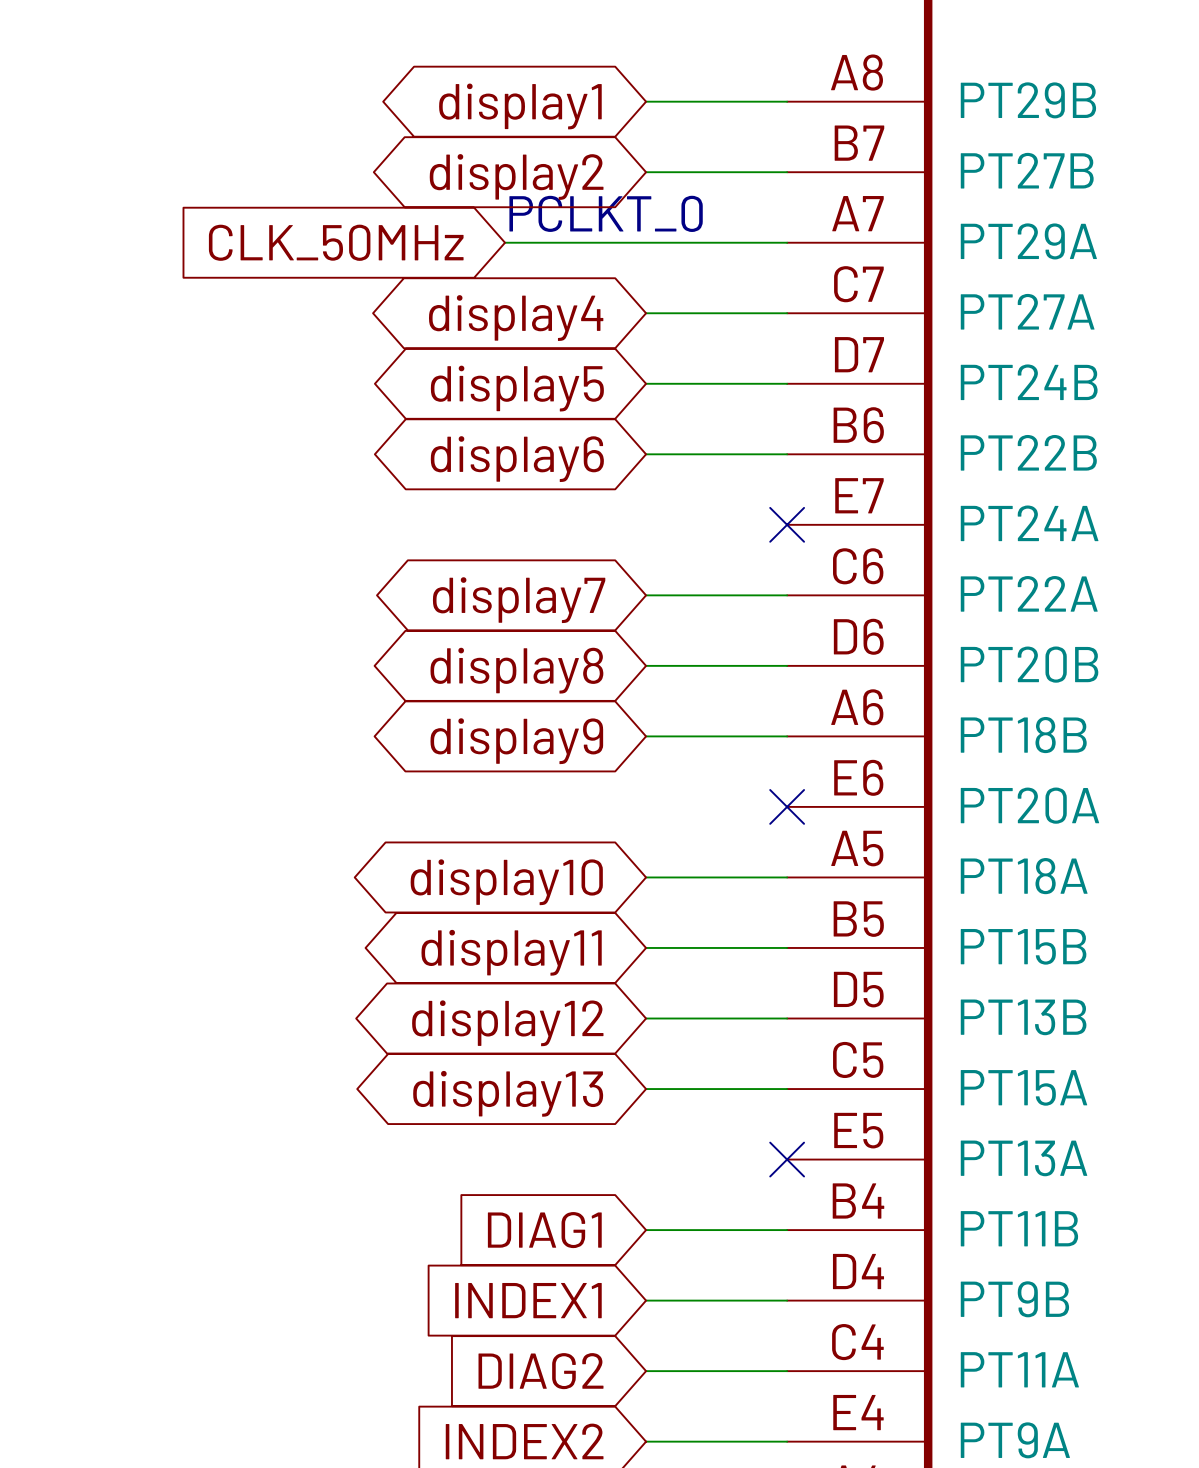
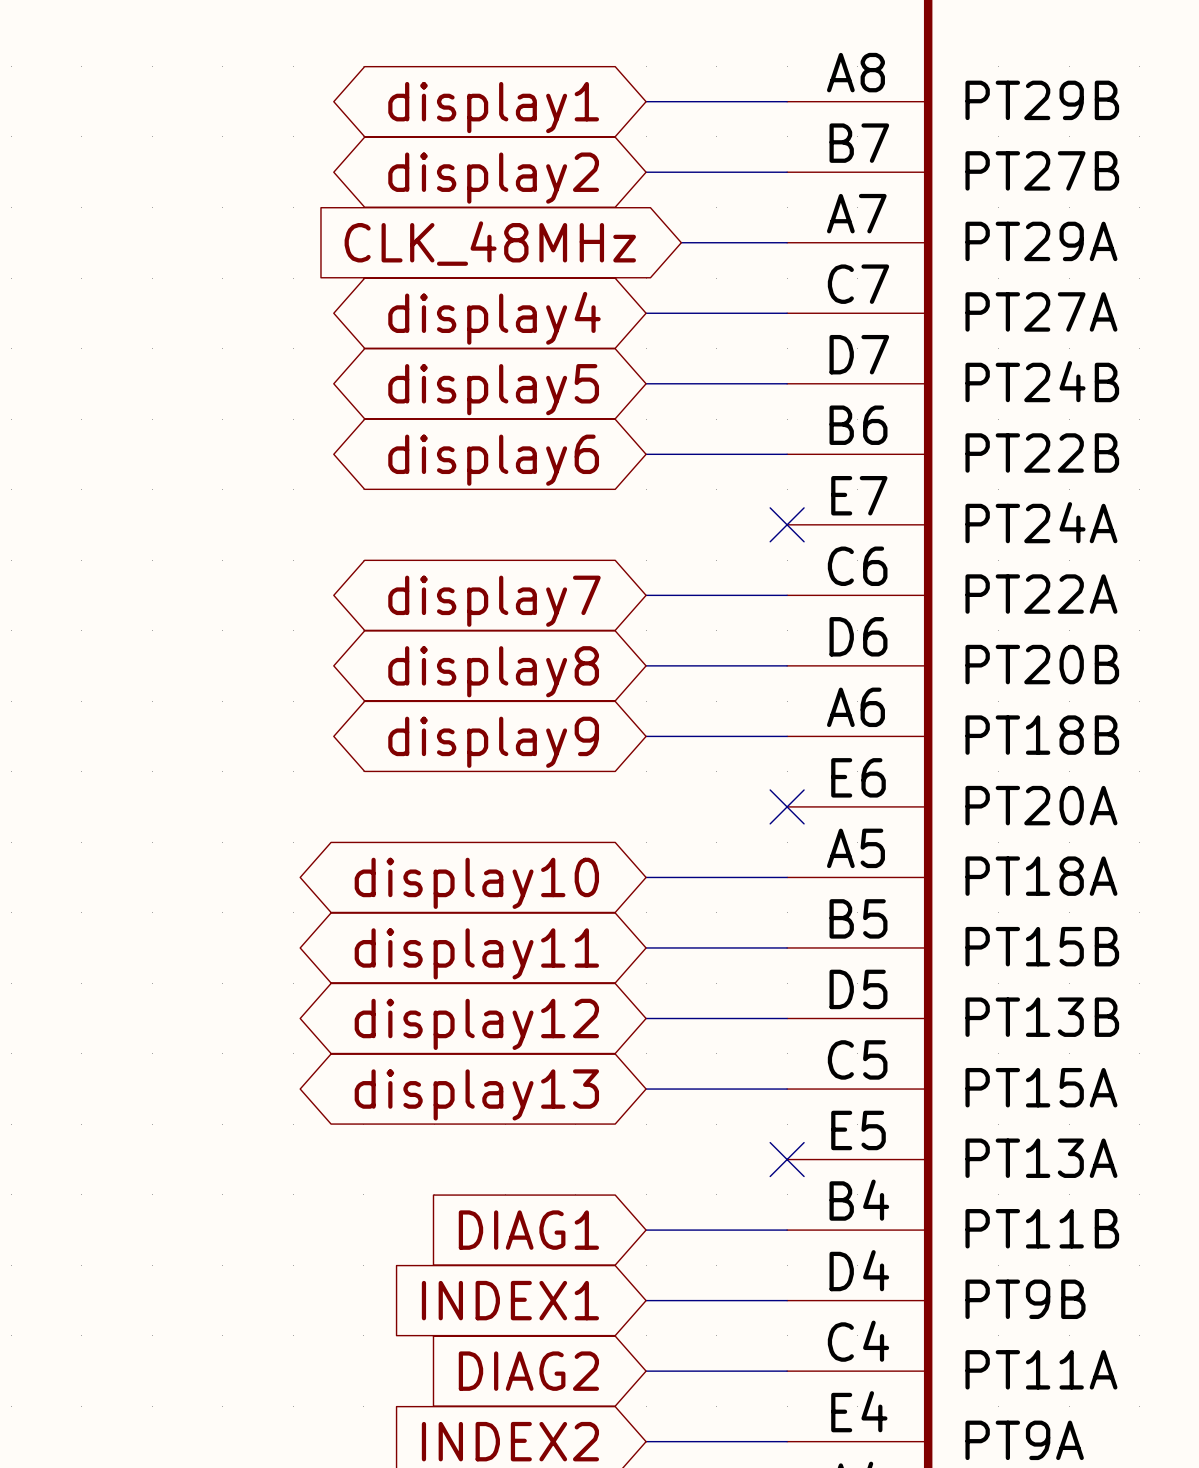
text: PCLKT_0 (606, 213) -> none
global label: CLK_50MHz (336, 242) -> CLK_48MHz (490, 243)
wire: (505, 242) (681, 242) -> none

